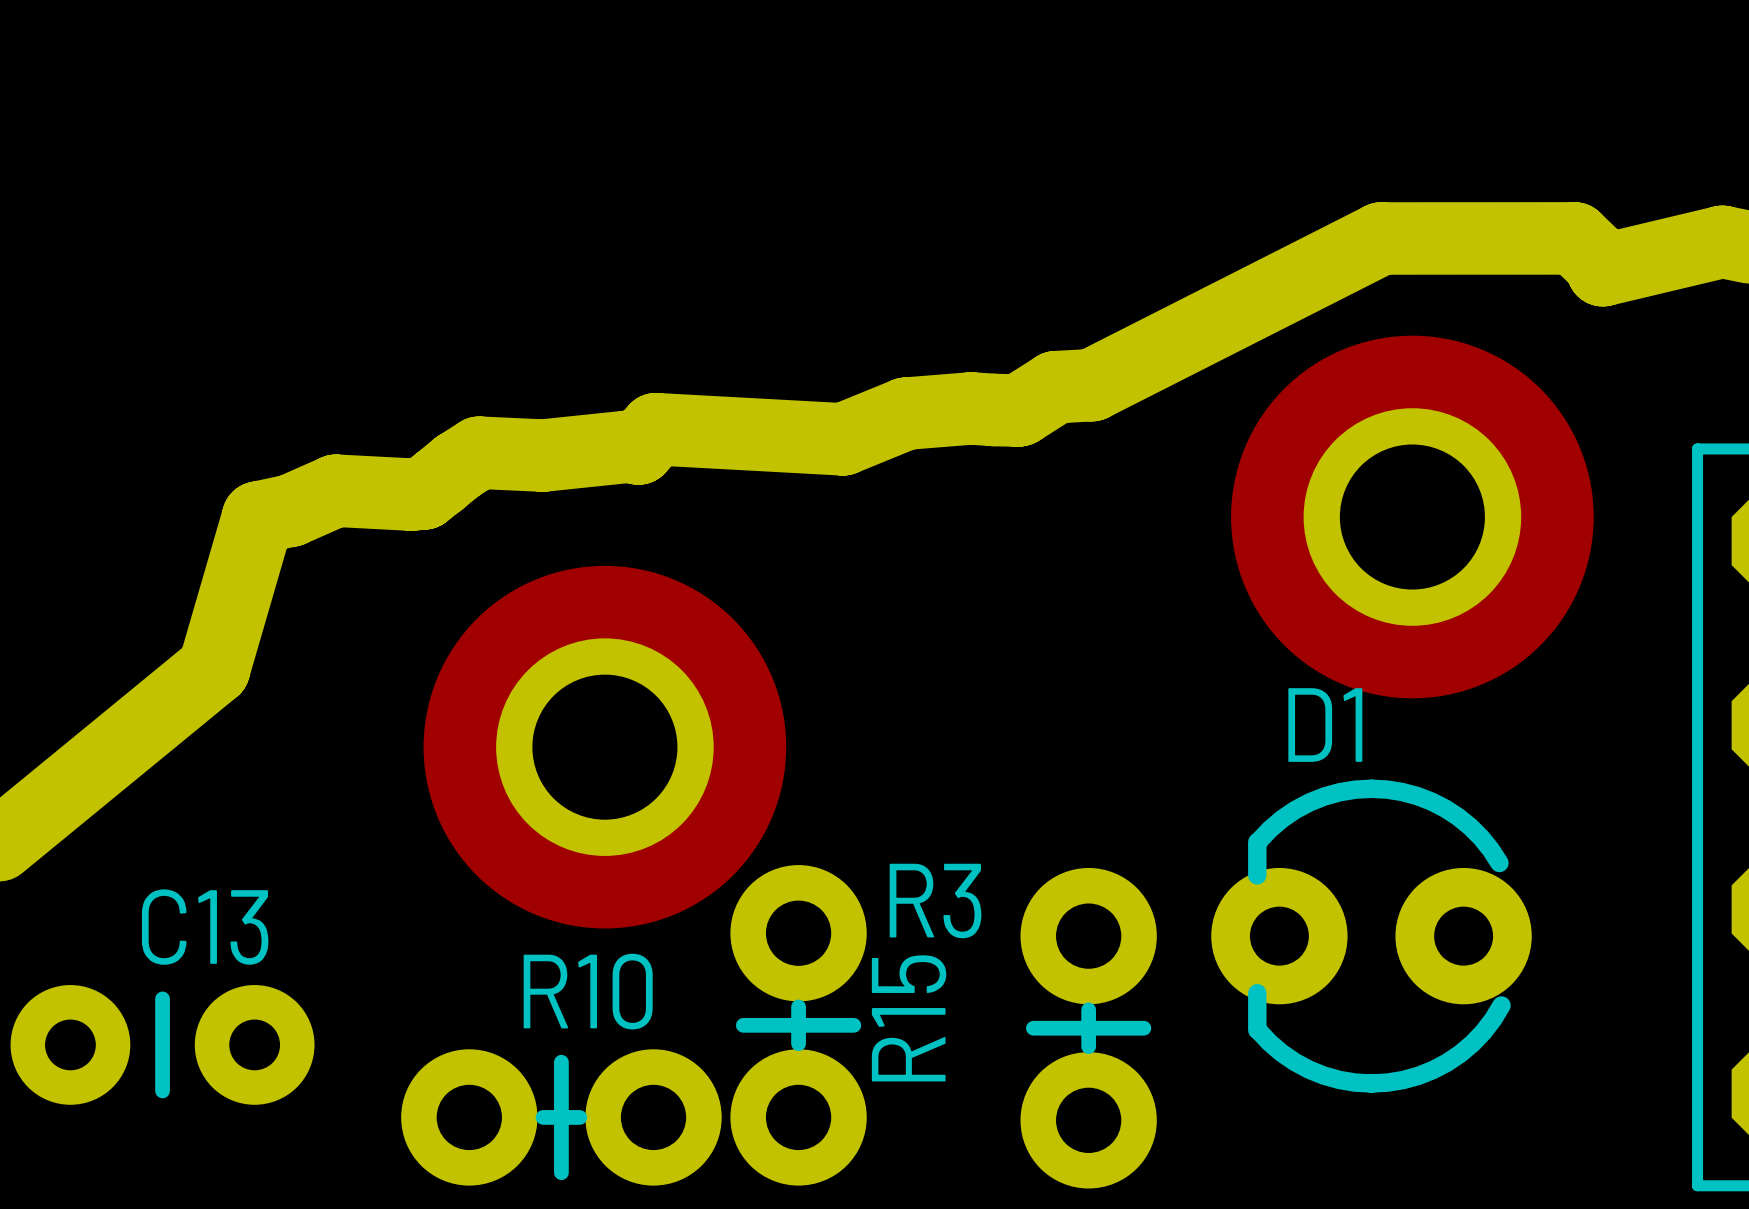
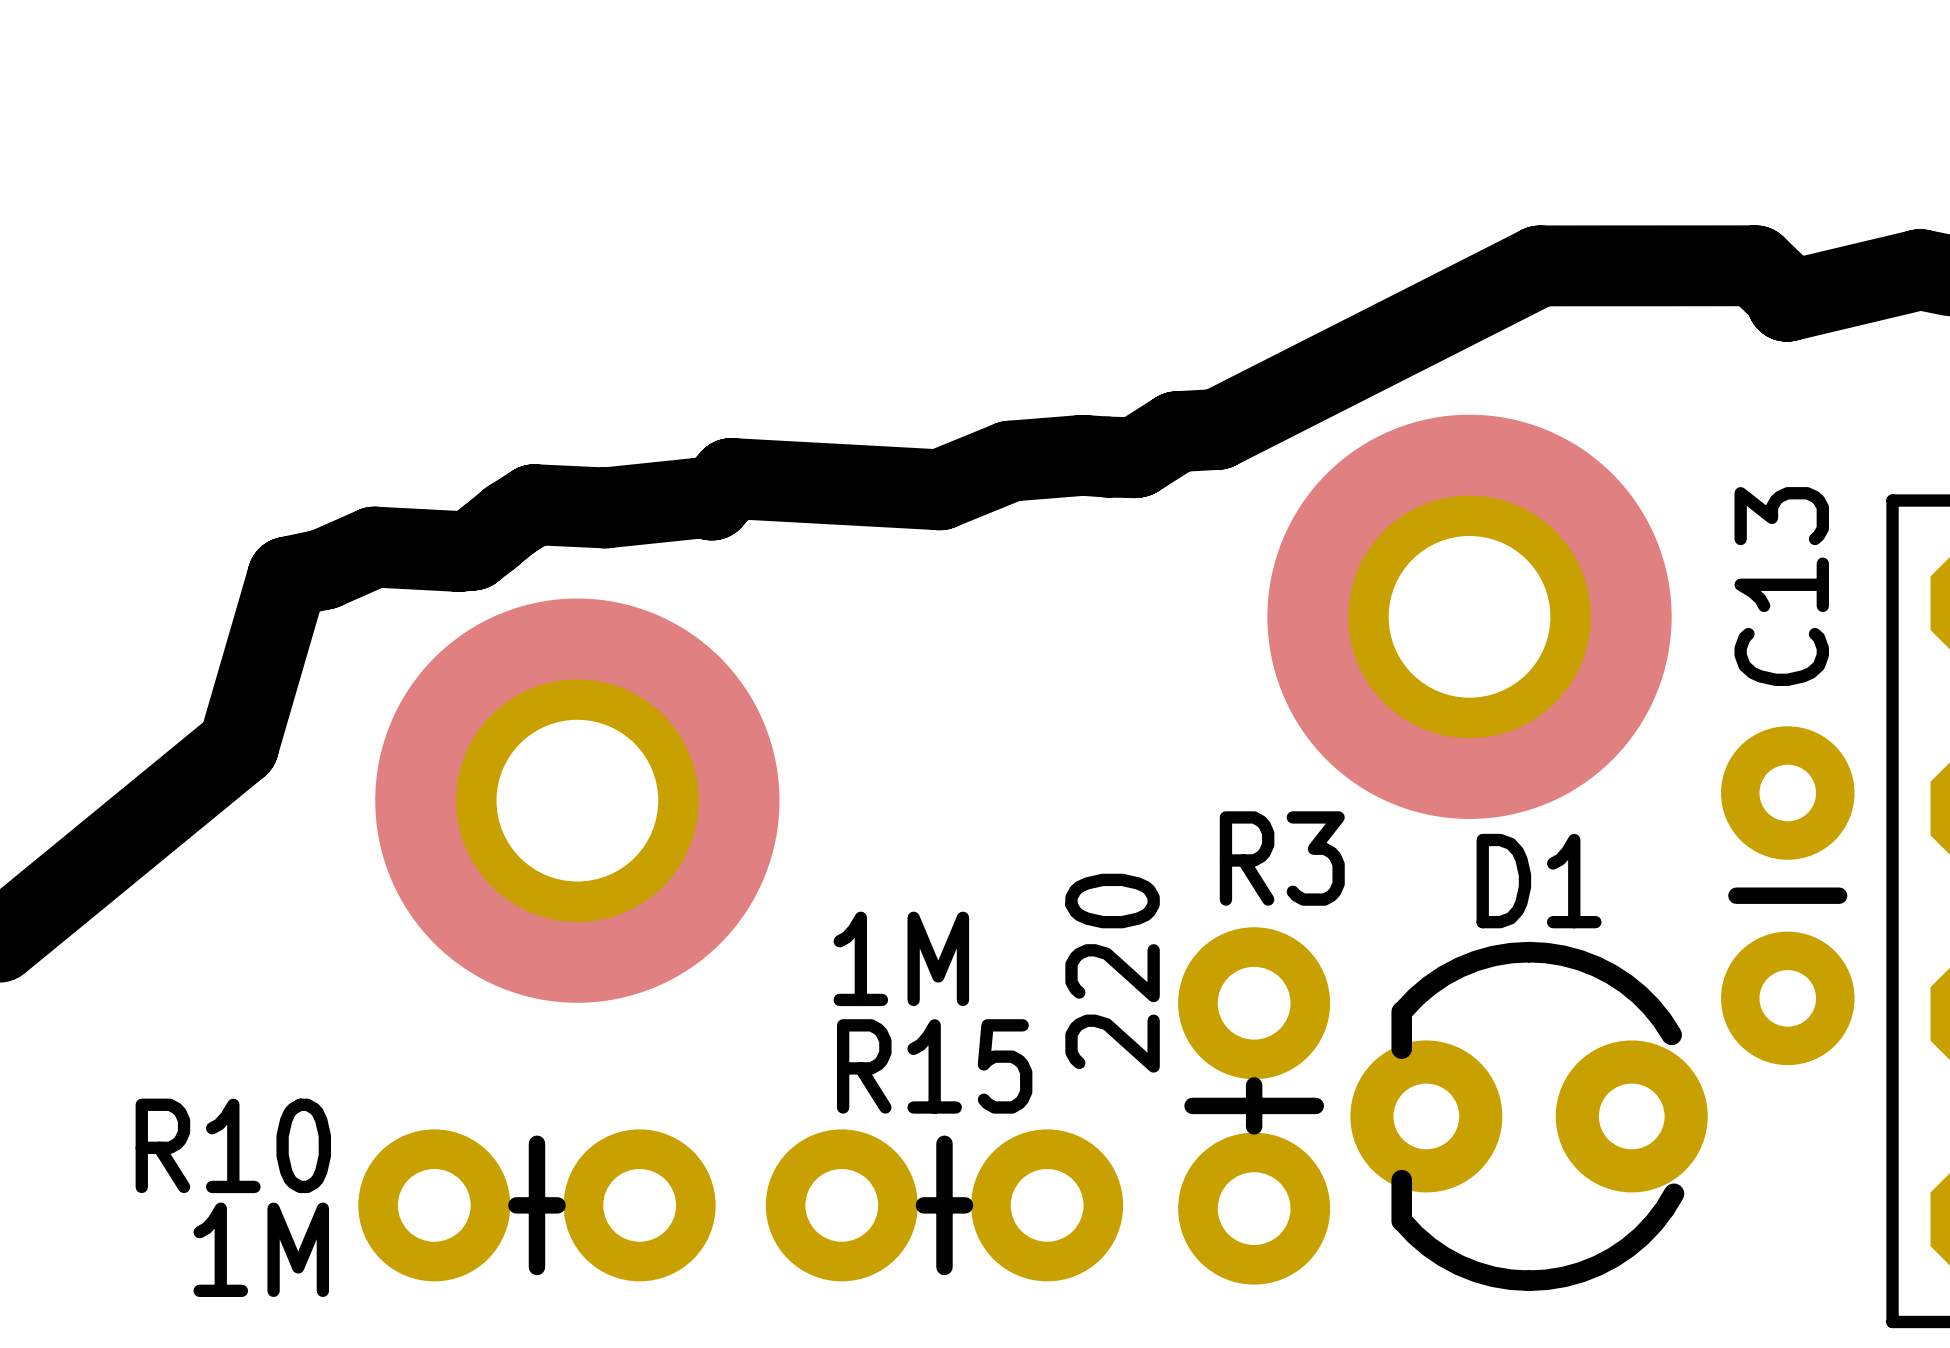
part position: (1412, 517) -> (1469, 616)
D1 name position: D1 (1325, 725) -> D1 (1539, 881)
part position: (604, 747) -> (577, 800)
R3 value: none -> 220 (1112, 973)
R15 value: none -> 1M (901, 958)
R3 name position: R3 (935, 901) -> R3 (1282, 858)
C13 name position: C13 (205, 927) -> C13 (1781, 586)
D1 position: (1371, 936) -> (1529, 1116)
R10 name position: R10 (588, 991) -> R10 (233, 1145)
R15 name position: R15 (909, 1018) -> R15 (934, 1066)
R15 rotation: 0° (798, 1025) -> 90° clockwise (944, 1205)
R3 position: (1088, 1028) -> (1254, 1105)
C13 rotation: 0° (162, 1044) -> 90° clockwise (1787, 895)
C13 position: (162, 1044) -> (1787, 895)
R10 position: (561, 1117) -> (536, 1205)
R10 value: none -> 1M (261, 1249)

